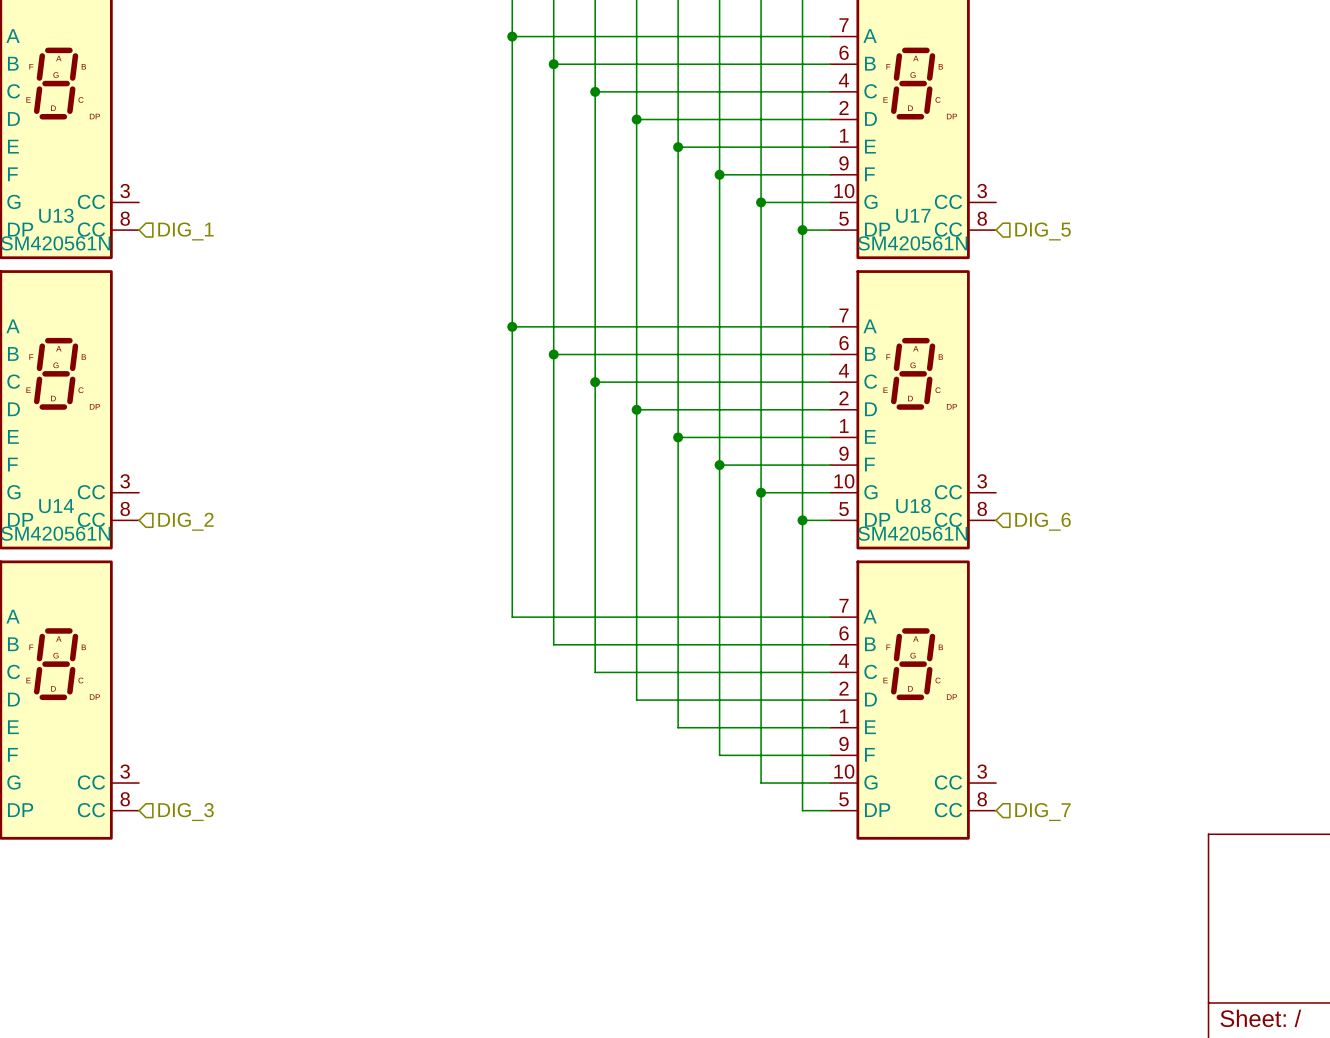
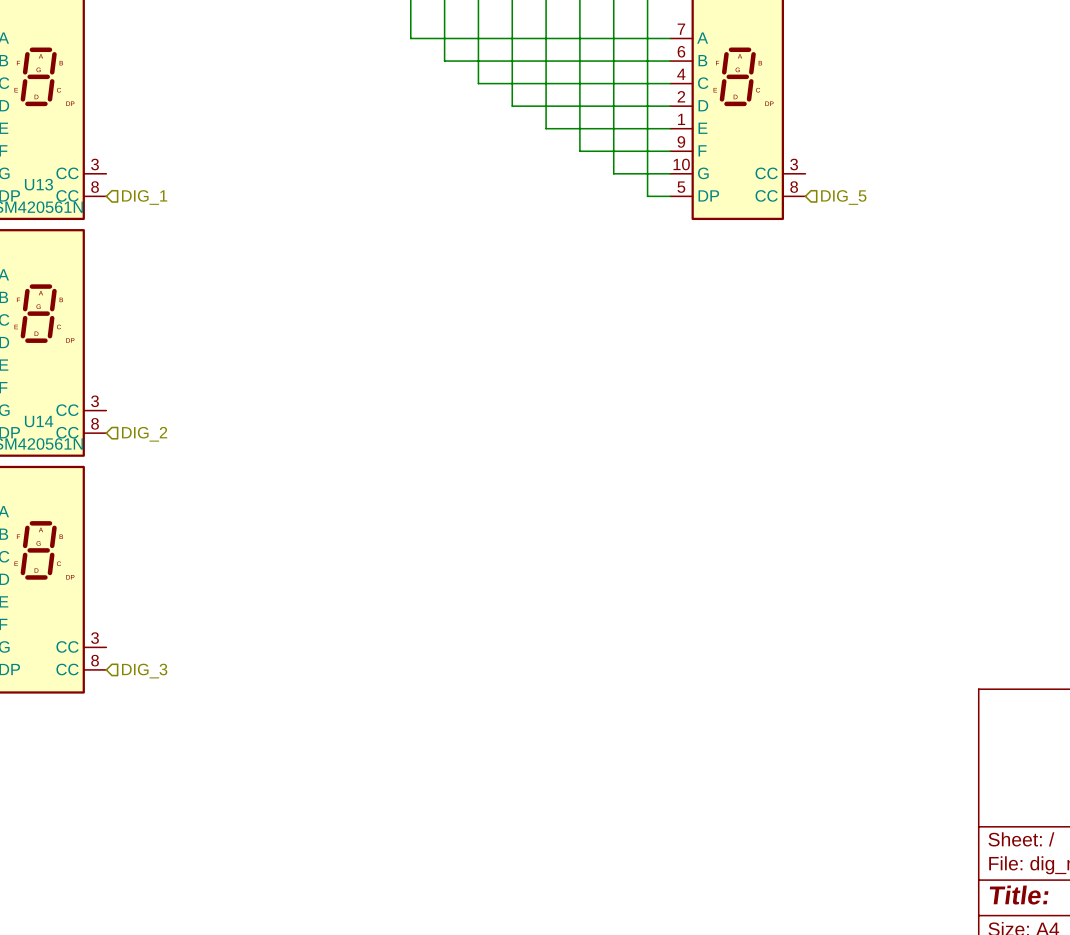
wire: (512, 36) (512, 617) (830, 617) -> none
junction: (512, 36) -> none
wire: (553, 64) (553, 644) (830, 644) -> none
junction: (553, 64) -> none
wire: (595, 91) (595, 672) (830, 672) -> none
junction: (595, 91) -> none
wire: (636, 119) (636, 700) (830, 700) -> none
junction: (636, 119) -> none
wire: (678, 147) (678, 727) (830, 727) -> none
junction: (678, 147) -> none
wire: (719, 174) (719, 755) (830, 755) -> none
junction: (719, 174) -> none
wire: (761, 202) (761, 783) (830, 783) -> none
junction: (761, 202) -> none
wire: (802, 230) (802, 810) (830, 810) -> none
junction: (802, 230) -> none
wire: (512, 326) (830, 326) -> none
junction: (512, 326) -> none
wire: (553, 354) (830, 354) -> none
junction: (553, 354) -> none
wire: (595, 382) (830, 382) -> none
junction: (595, 382) -> none
wire: (636, 409) (830, 409) -> none
junction: (636, 409) -> none
U17: SM420561N (913, 409) -> none
wire: (678, 437) (830, 437) -> none
junction: (678, 437) -> none
wire: (719, 465) (830, 465) -> none
junction: (719, 465) -> none
wire: (761, 492) (830, 492) -> none
junction: (761, 492) -> none
wire: (802, 520) (830, 520) -> none
junction: (802, 520) -> none
hierarchical label: DIG_6 (1043, 521) -> none
U18: SM420561N (913, 700) -> none
hierarchical label: DIG_7 (1042, 812) -> none

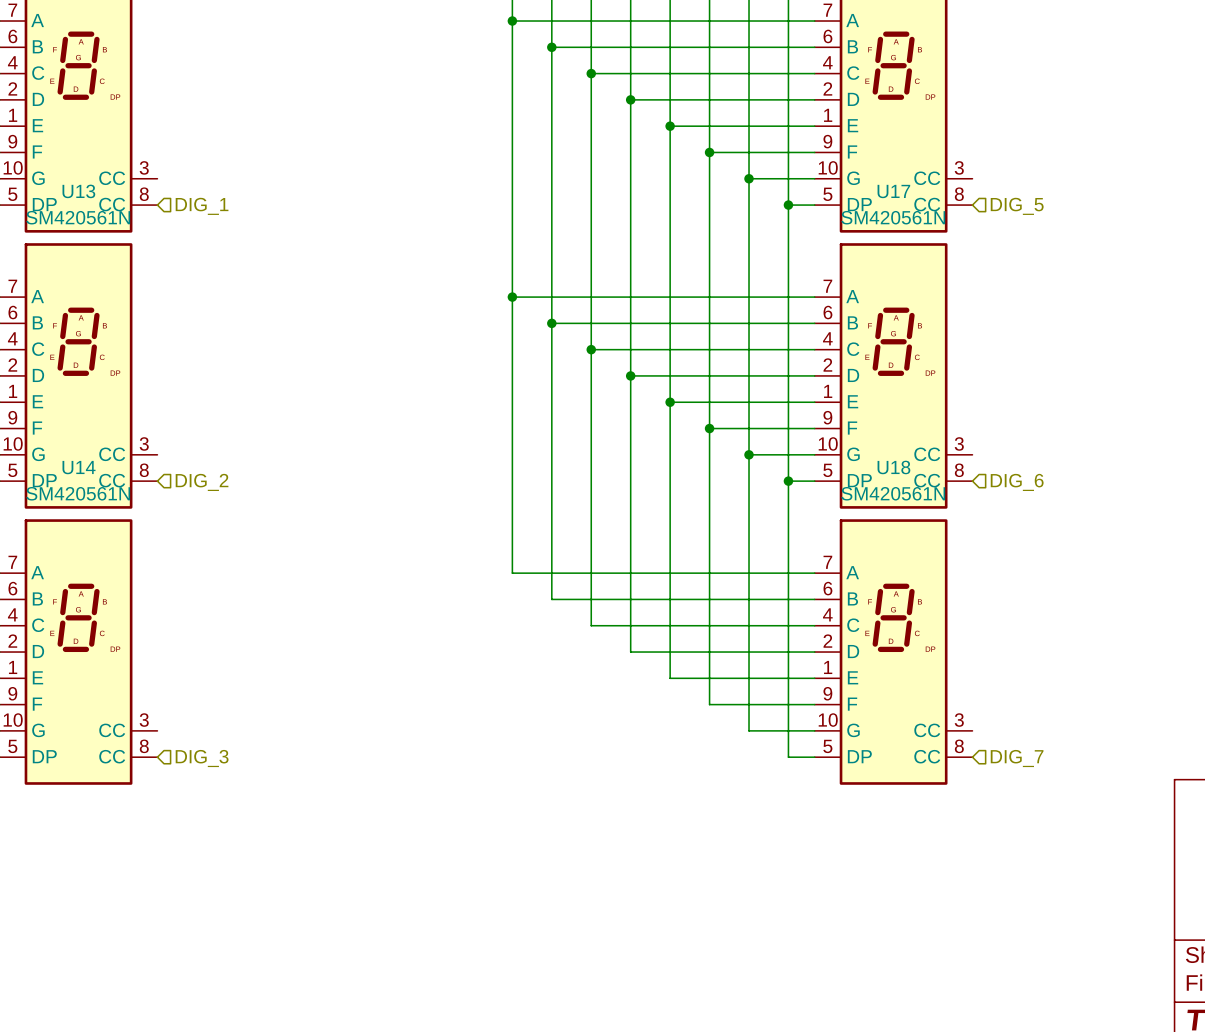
wire: none -> (512, 21) (512, 573) (814, 573)
junction: none -> (512, 21)
wire: none -> (551, 47) (551, 599) (814, 599)
junction: none -> (551, 47)
wire: none -> (591, 73) (591, 625) (814, 625)
junction: none -> (591, 73)
wire: none -> (630, 99) (630, 652) (814, 652)
junction: none -> (630, 99)
wire: none -> (670, 126) (670, 678) (814, 678)
junction: none -> (670, 126)
wire: none -> (709, 152) (709, 704) (814, 704)
junction: none -> (709, 152)
wire: none -> (749, 178) (749, 730) (814, 730)
junction: none -> (749, 178)
wire: none -> (788, 205) (788, 757) (814, 757)
junction: none -> (788, 205)
wire: none -> (512, 297) (814, 297)
junction: none -> (512, 297)
wire: none -> (551, 323) (814, 323)
junction: none -> (551, 323)
wire: none -> (591, 349) (814, 349)
junction: none -> (591, 349)
wire: none -> (630, 375) (814, 375)
junction: none -> (630, 375)
U17: none -> SM420561N (893, 375)
wire: none -> (670, 402) (814, 402)
junction: none -> (670, 402)
wire: none -> (709, 428) (814, 428)
junction: none -> (709, 428)
wire: none -> (749, 454) (814, 454)
junction: none -> (749, 454)
wire: none -> (788, 481) (814, 481)
junction: none -> (788, 481)
hierarchical label: none -> DIG_6 (1017, 482)
U18: none -> SM420561N (893, 652)
hierarchical label: none -> DIG_7 (1017, 758)

